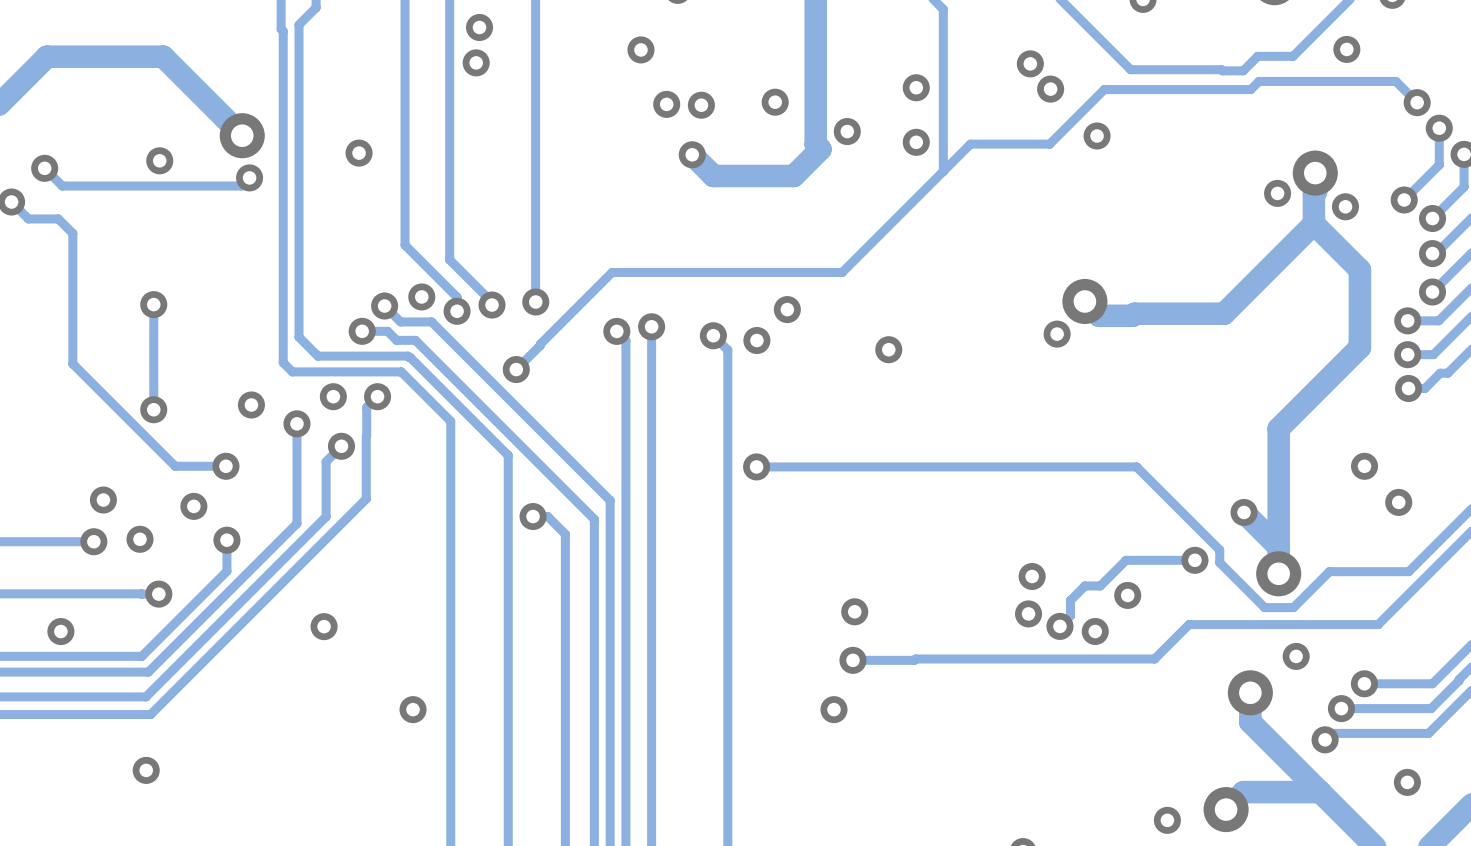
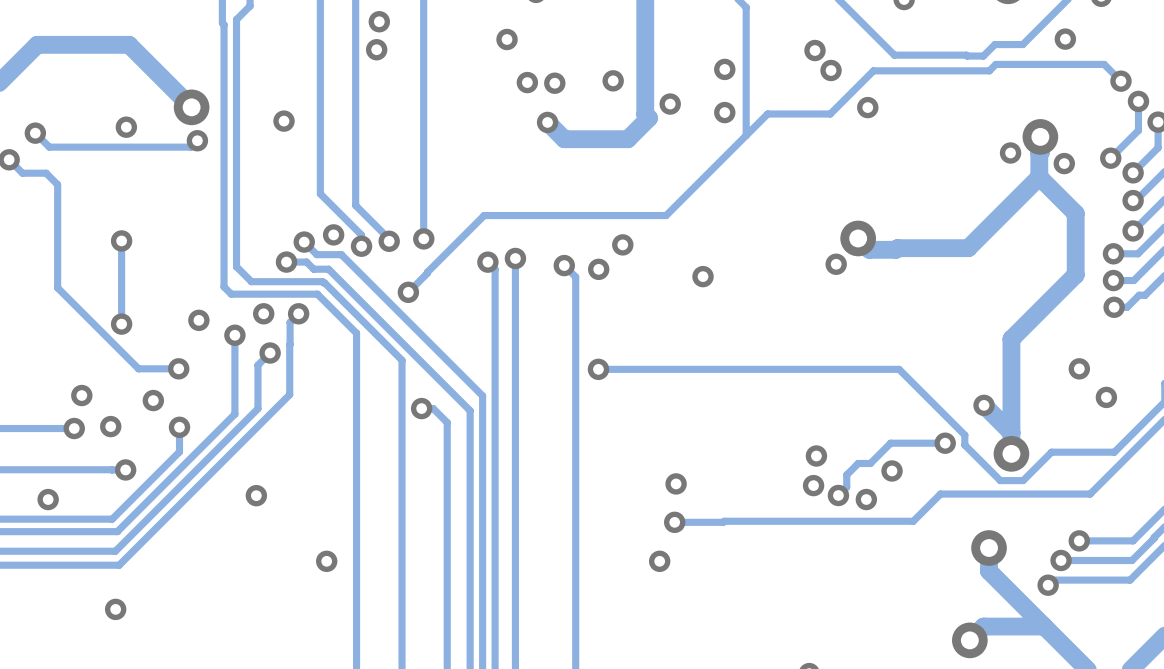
via: (1296, 656) -> none
via: (1407, 782) -> none
via: (1167, 820) -> none

